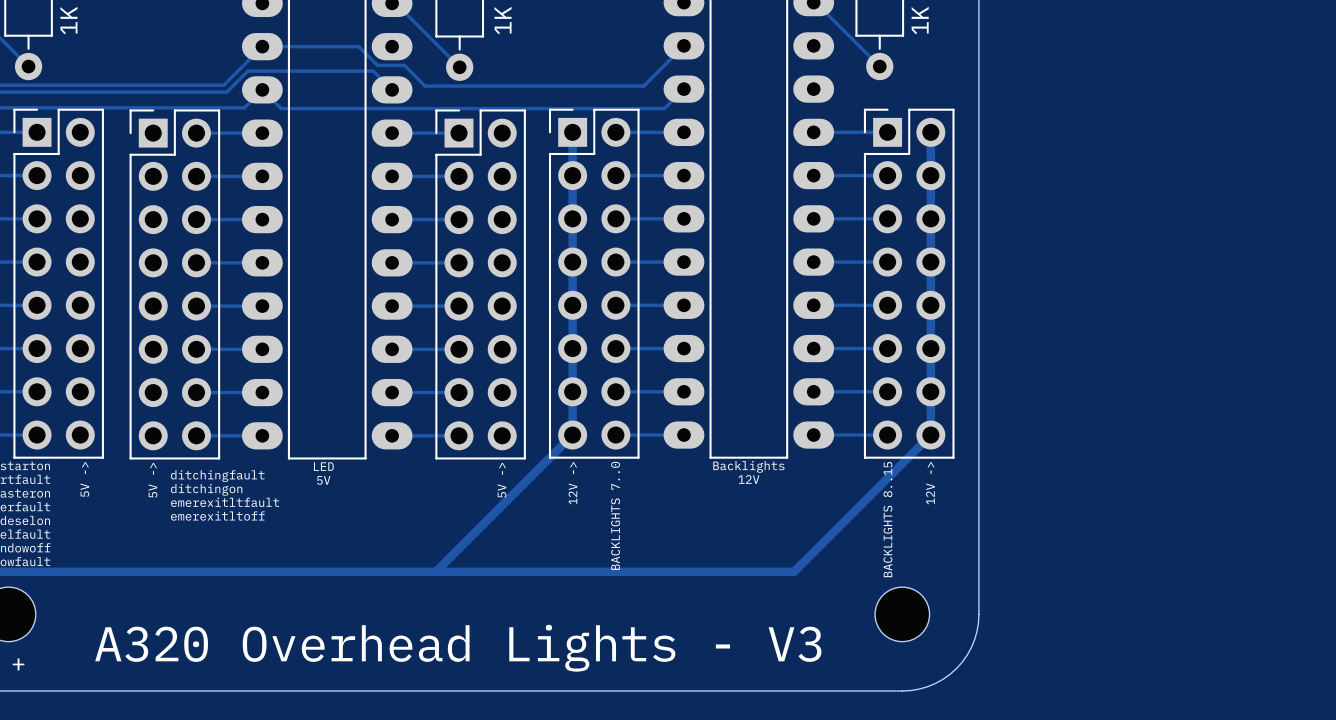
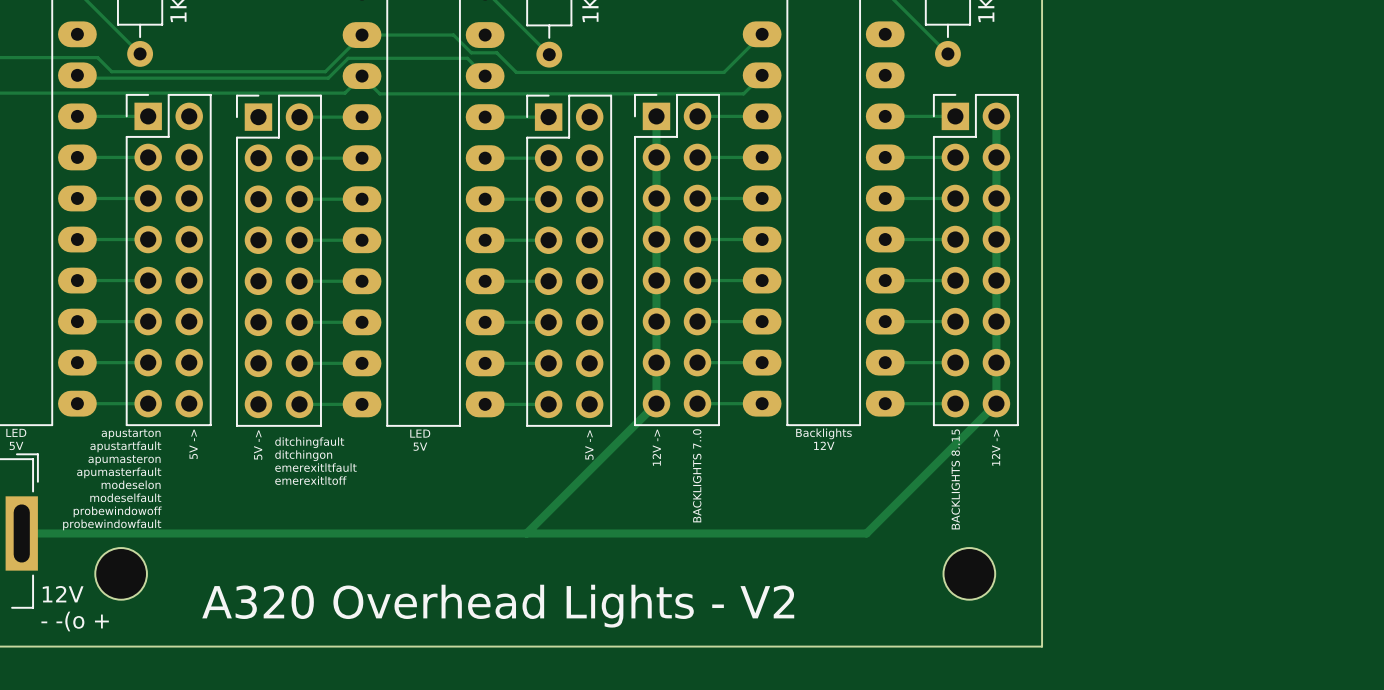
board edge: (978, 614) (977, 631) (971, 647) (956, 668) (943, 679) (927, 686) (902, 691) -> (1042, 573) (1042, 646) (969, 646)
text: A320 Overhead Lights - V3 (458, 648) -> A320 Overhead Lights - V2 (498, 606)

